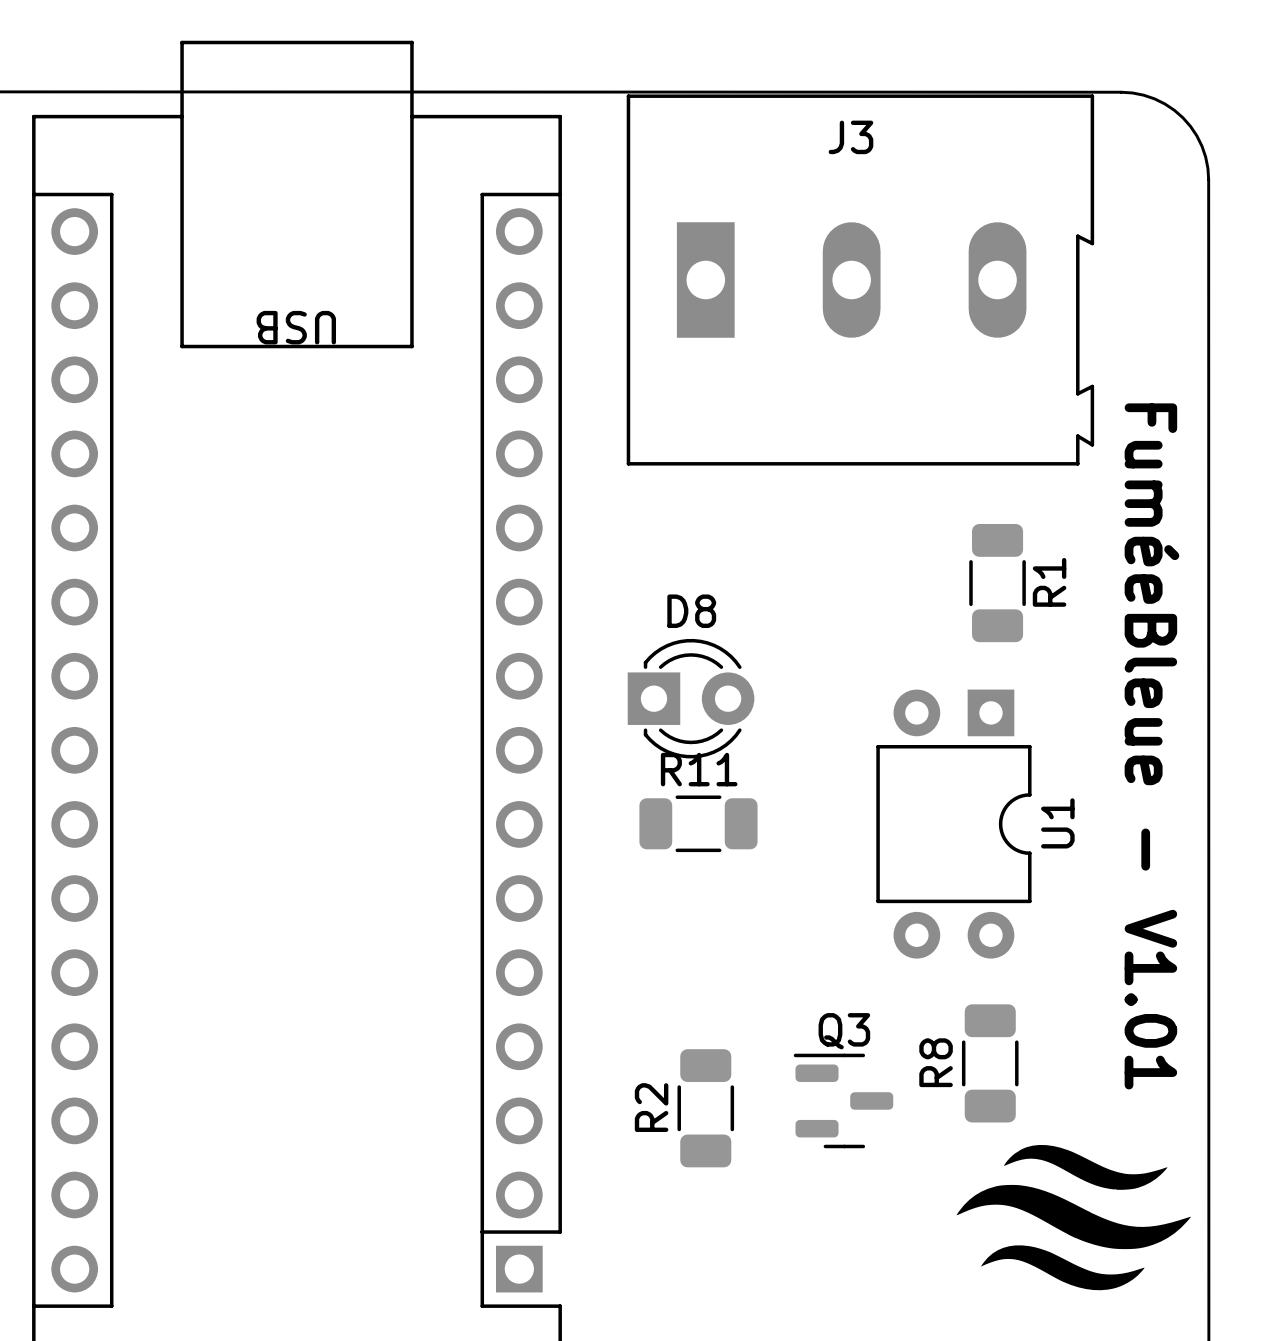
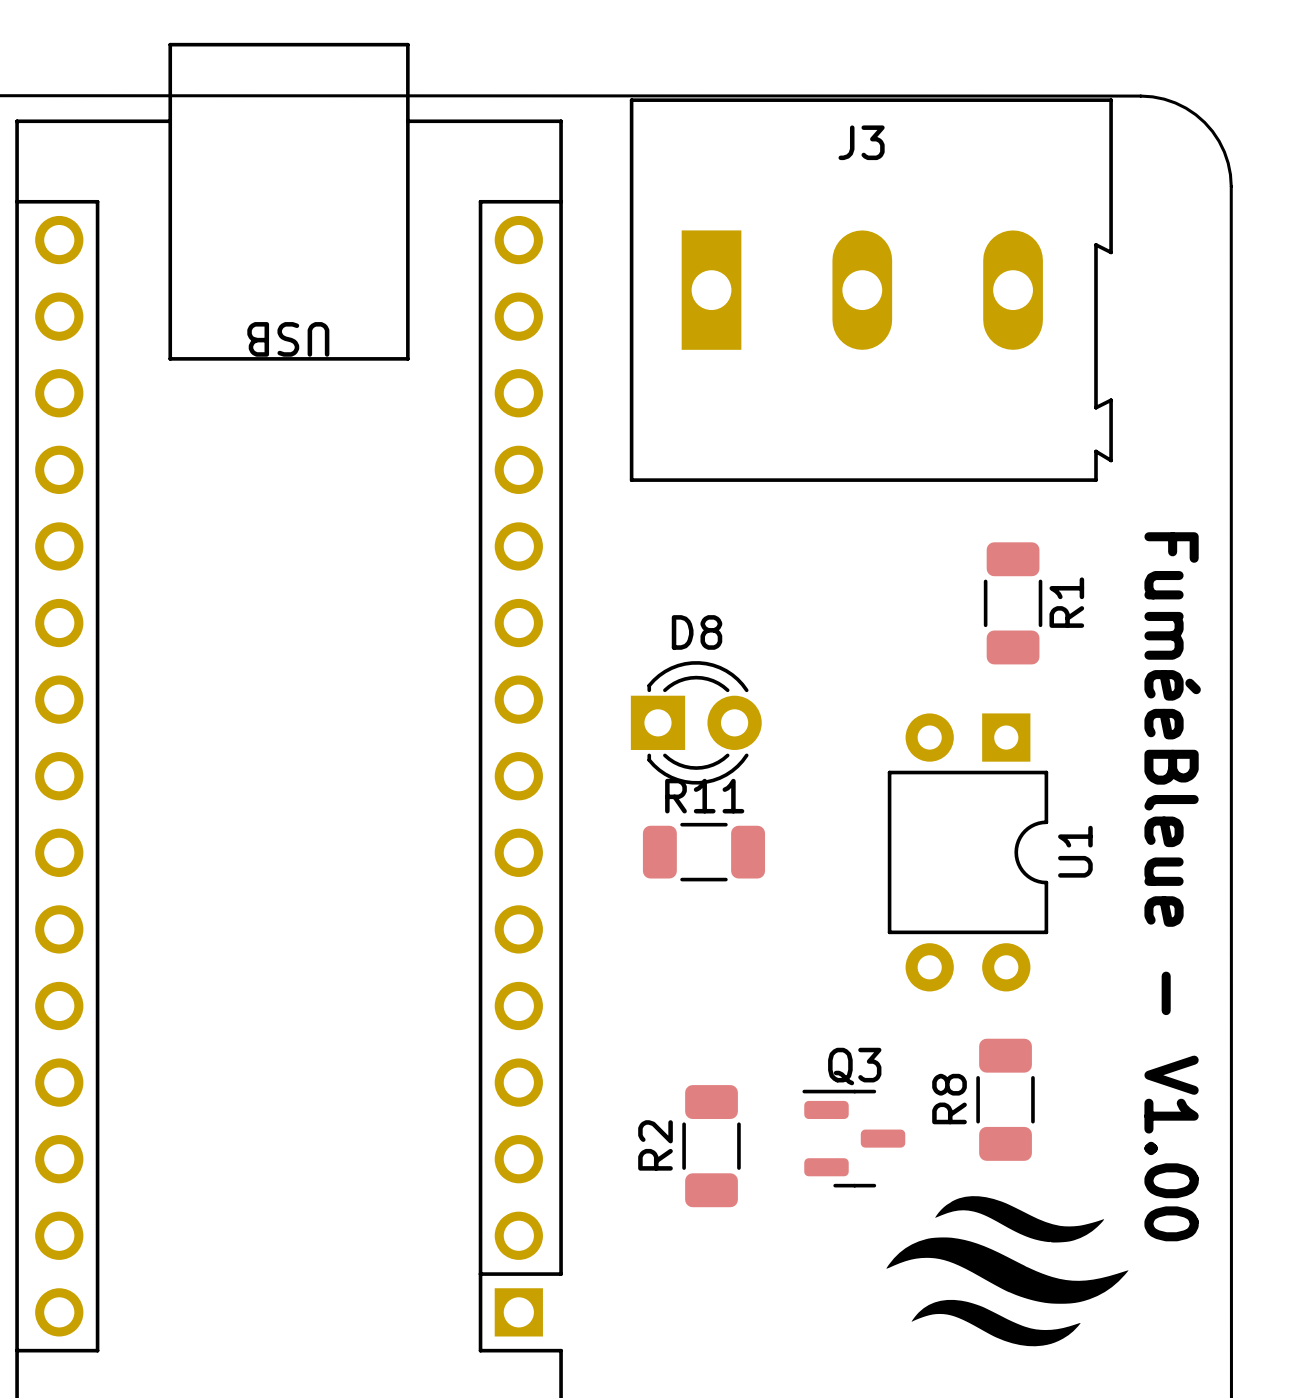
text: FuméeBleue - V1.01 (1151, 746) -> FuméeBleue - V1.00 (1172, 886)
drawing position: (1073, 1217) -> (1007, 1271)

